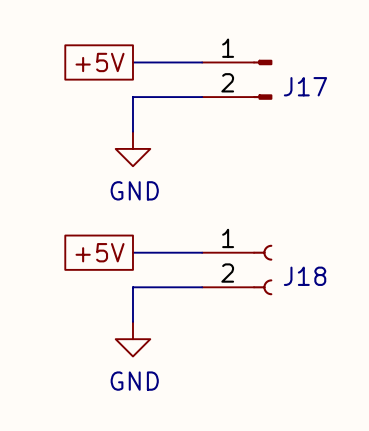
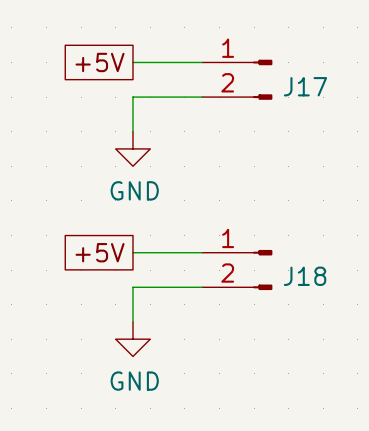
J18 symbol: [202, 244, 273, 296] -> [202, 249, 273, 291]

